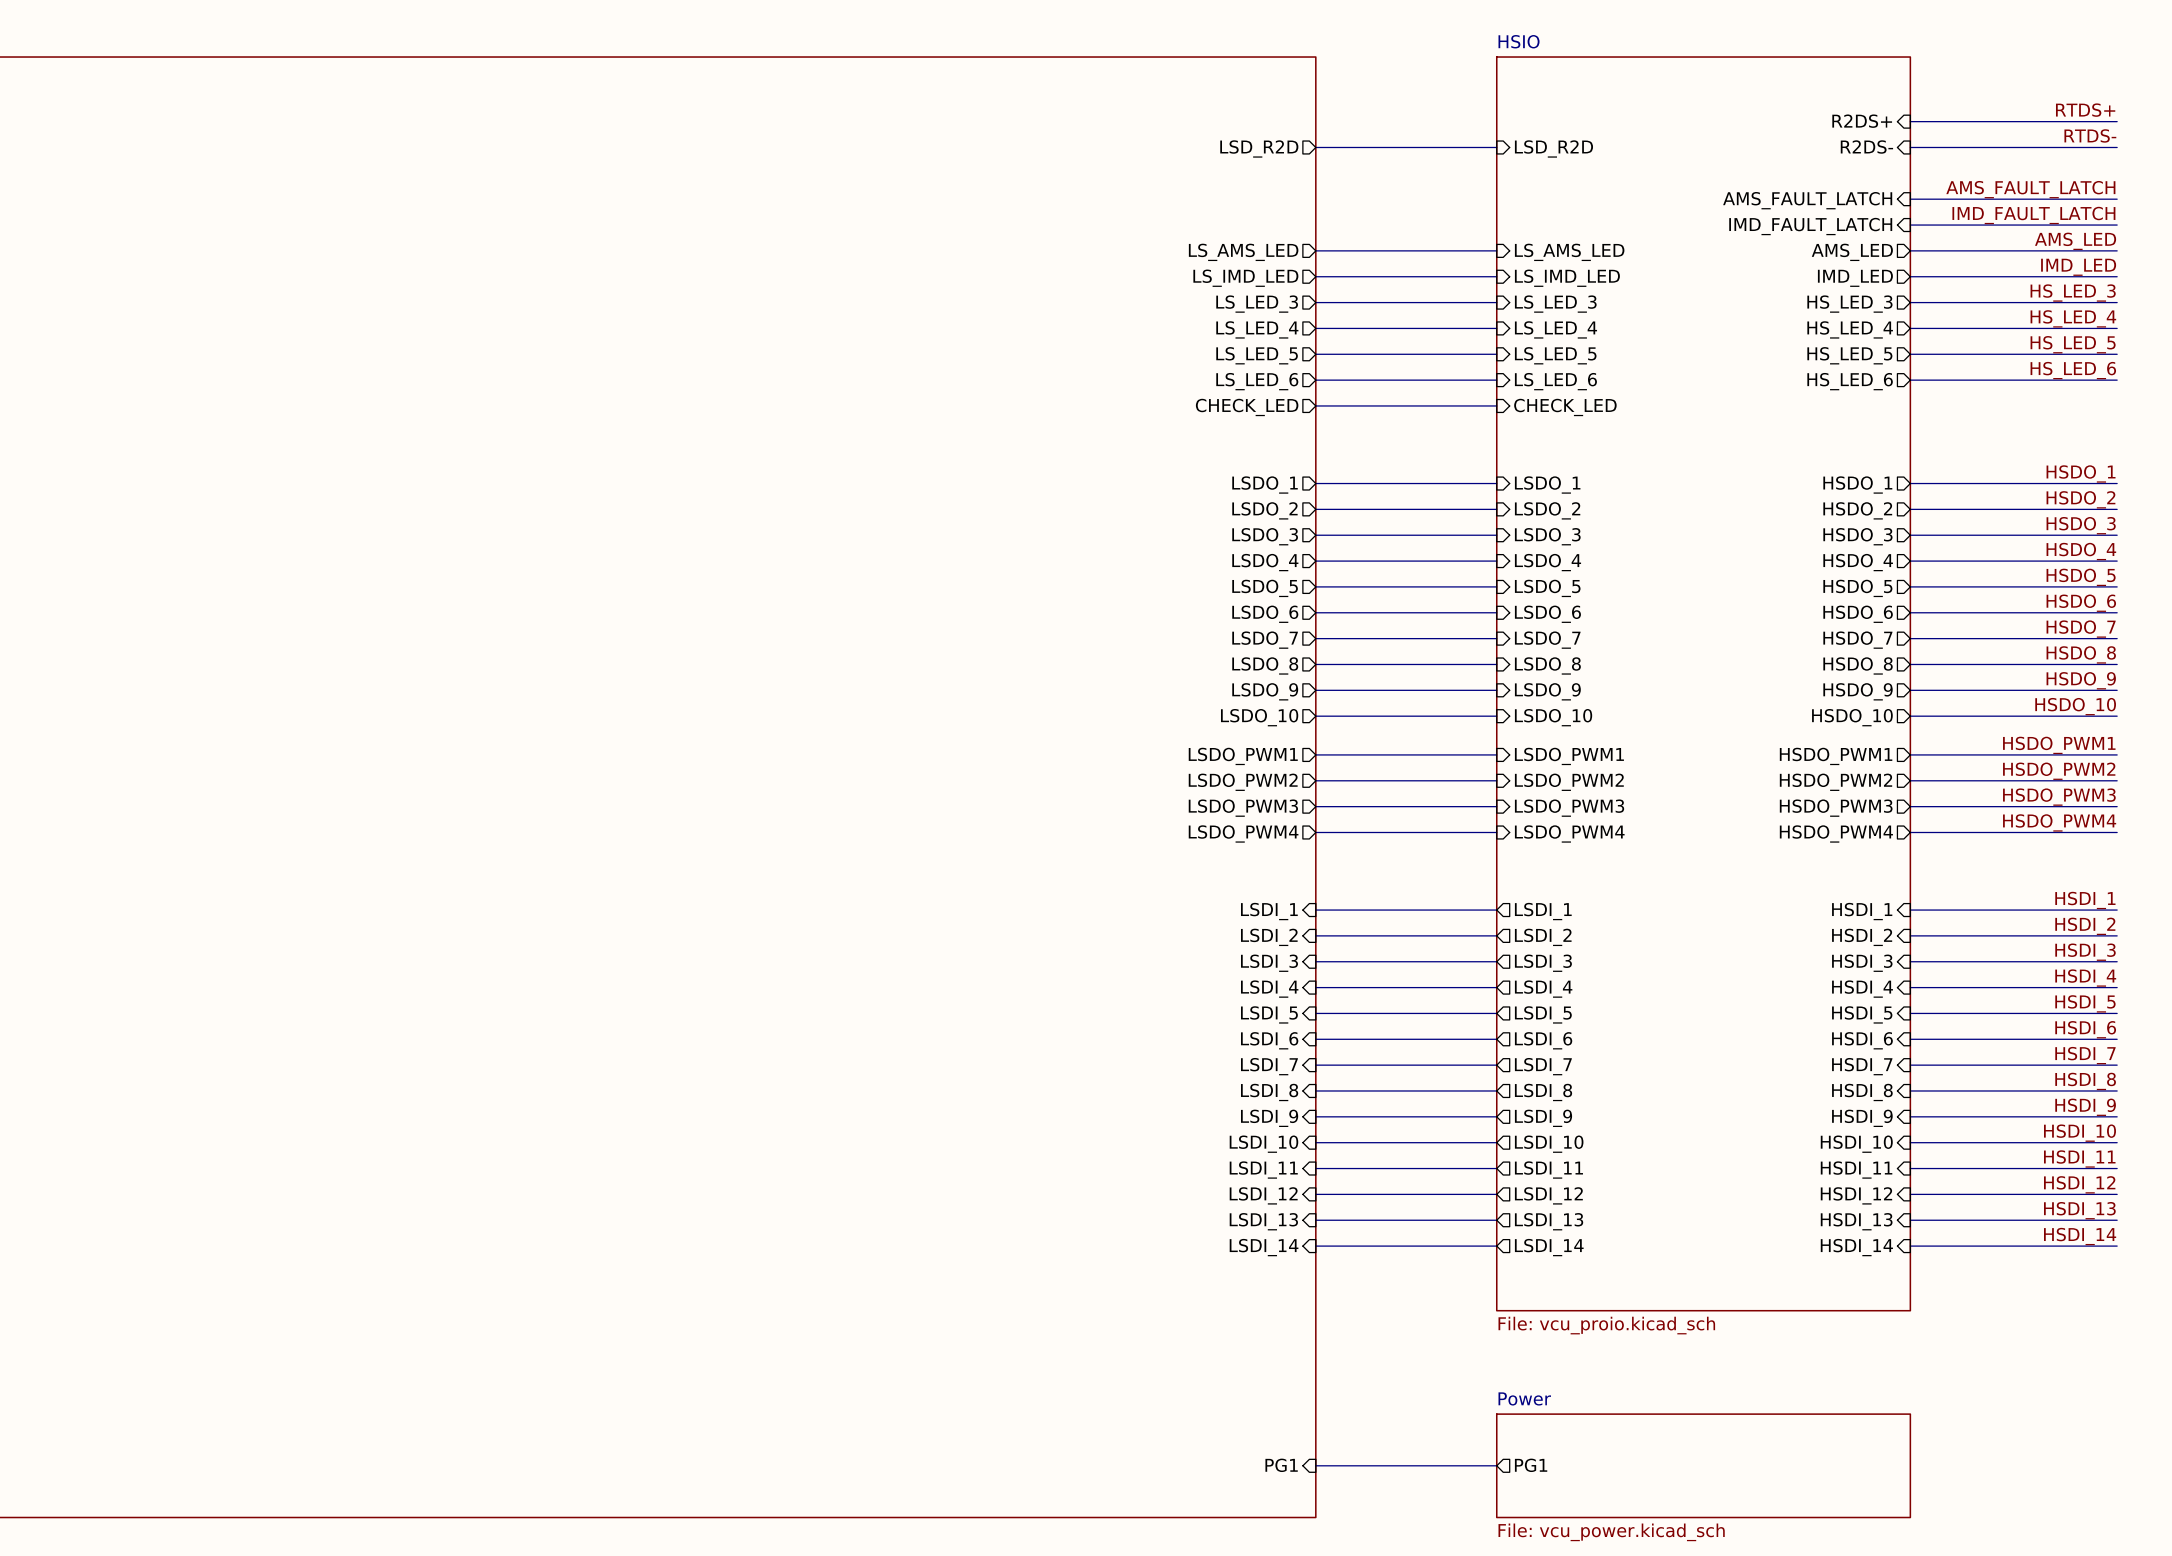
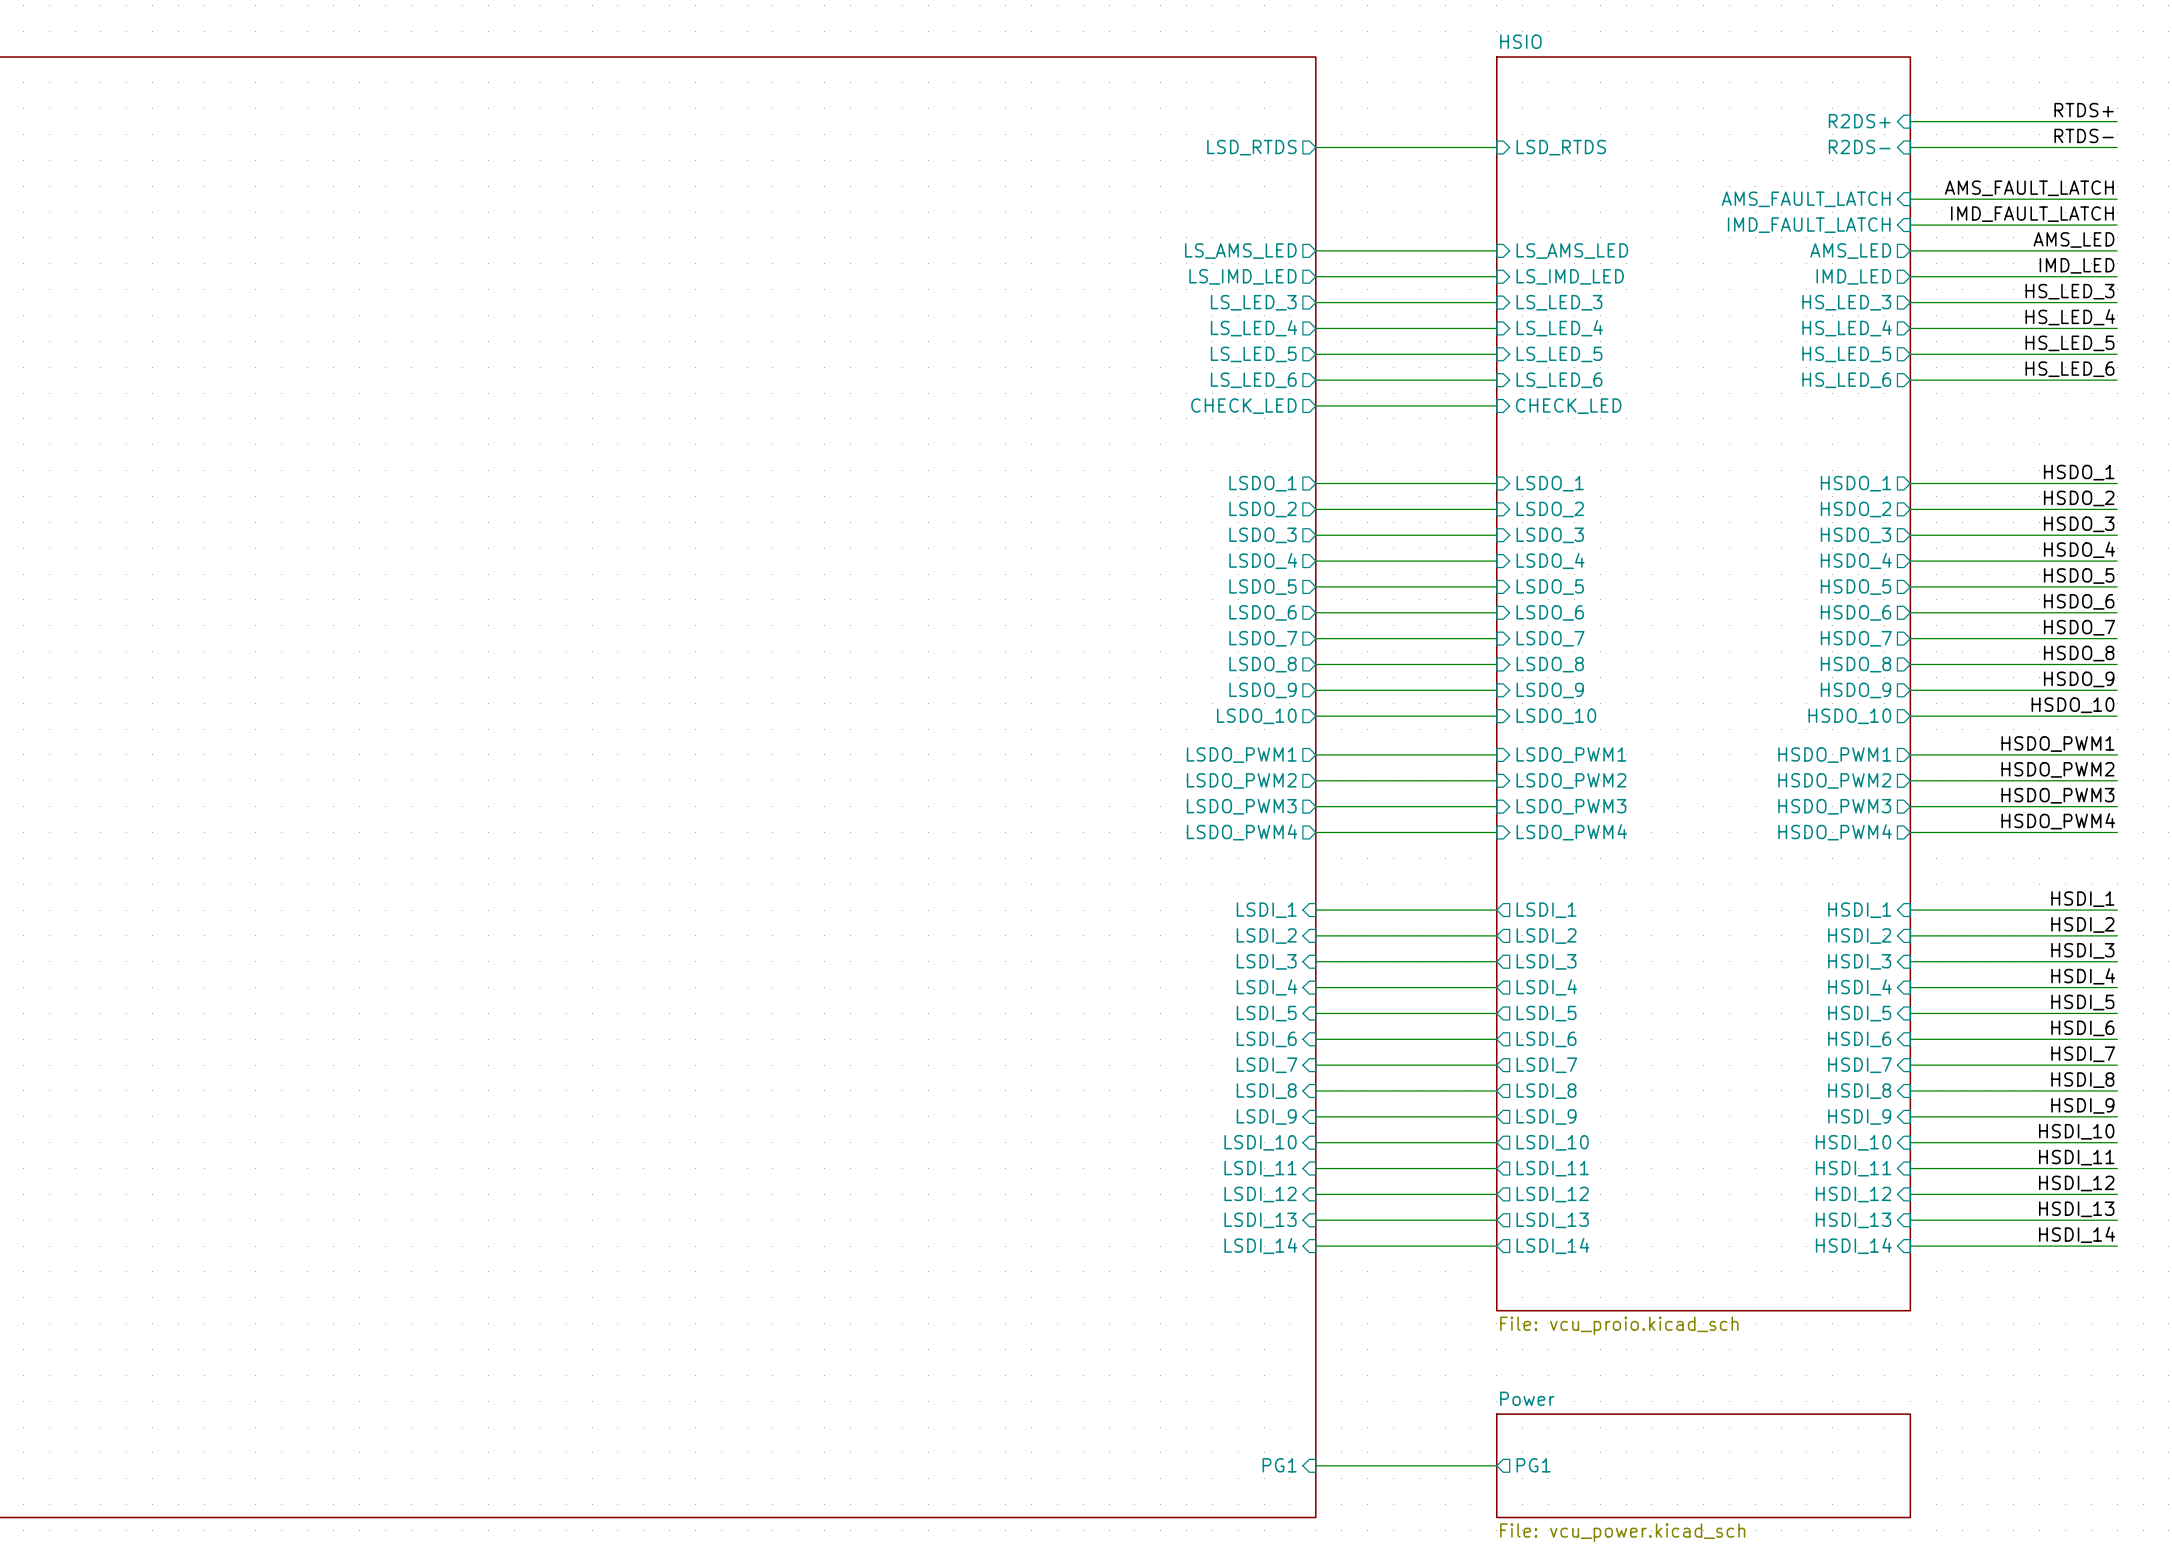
sheet pin: LSD_R2D (1259, 148) -> LSD_RTDS (1251, 147)
sheet pin: LSD_R2D (1553, 148) -> LSD_RTDS (1561, 147)

